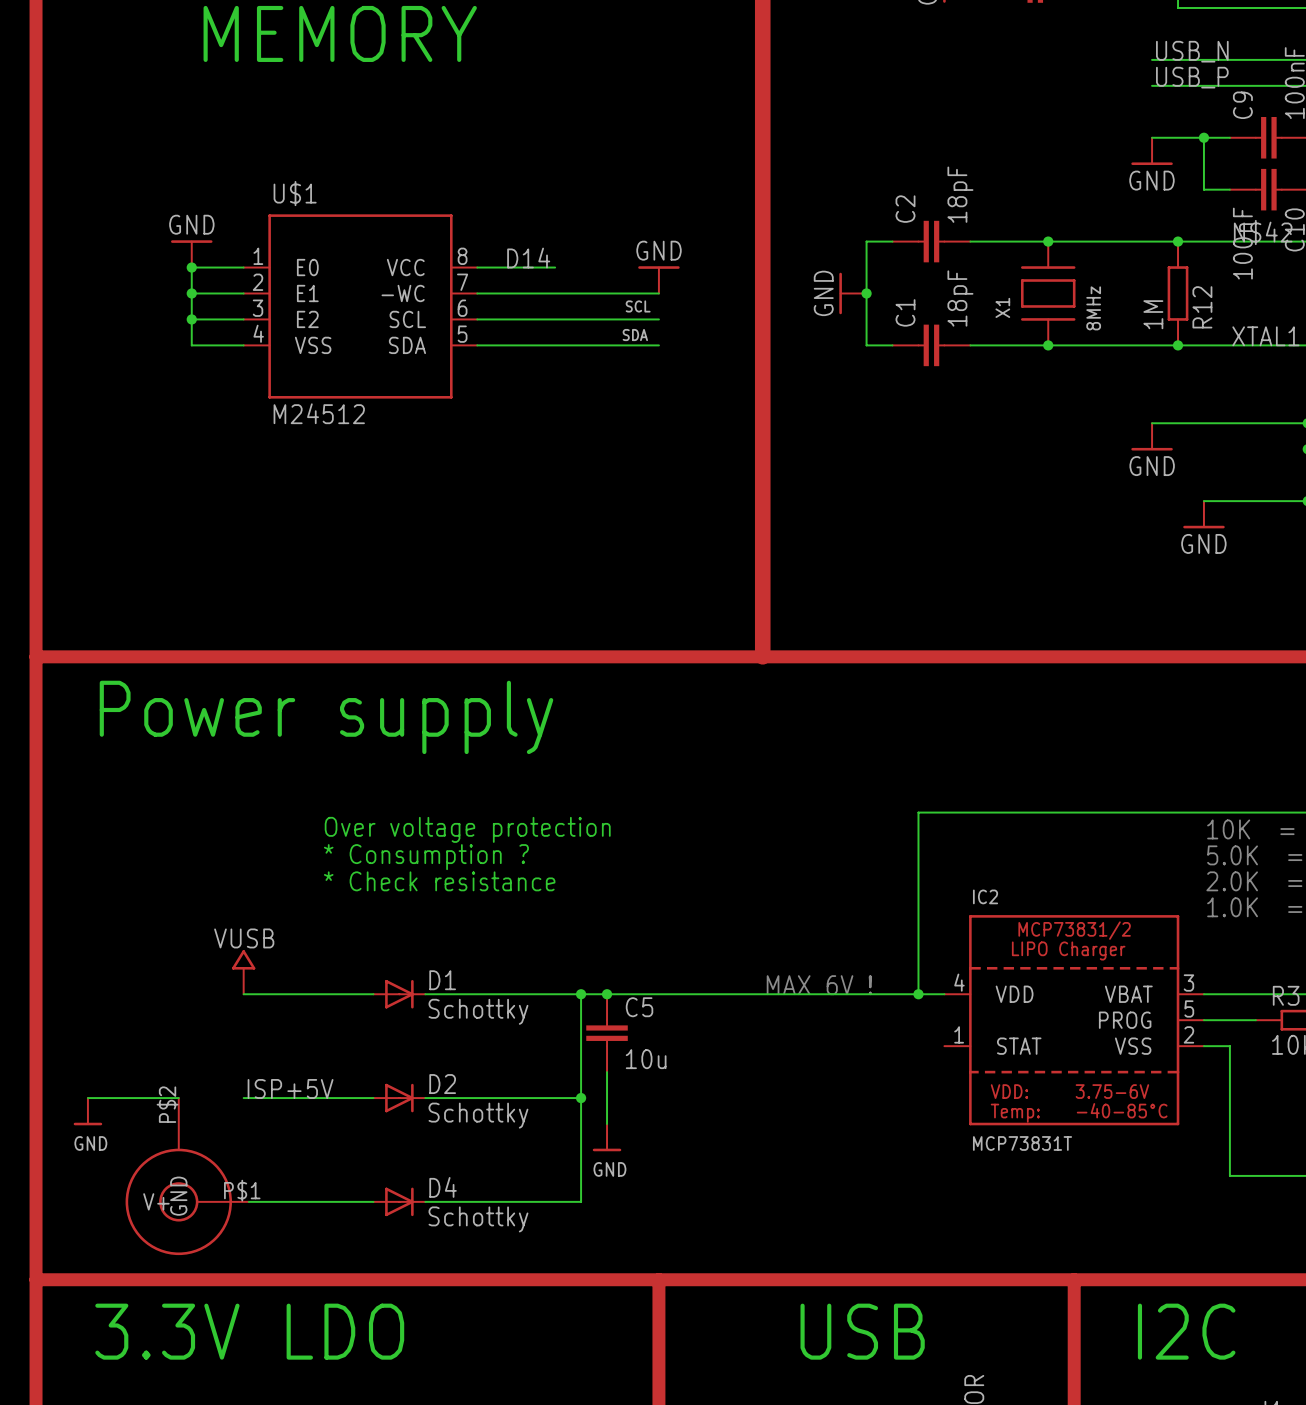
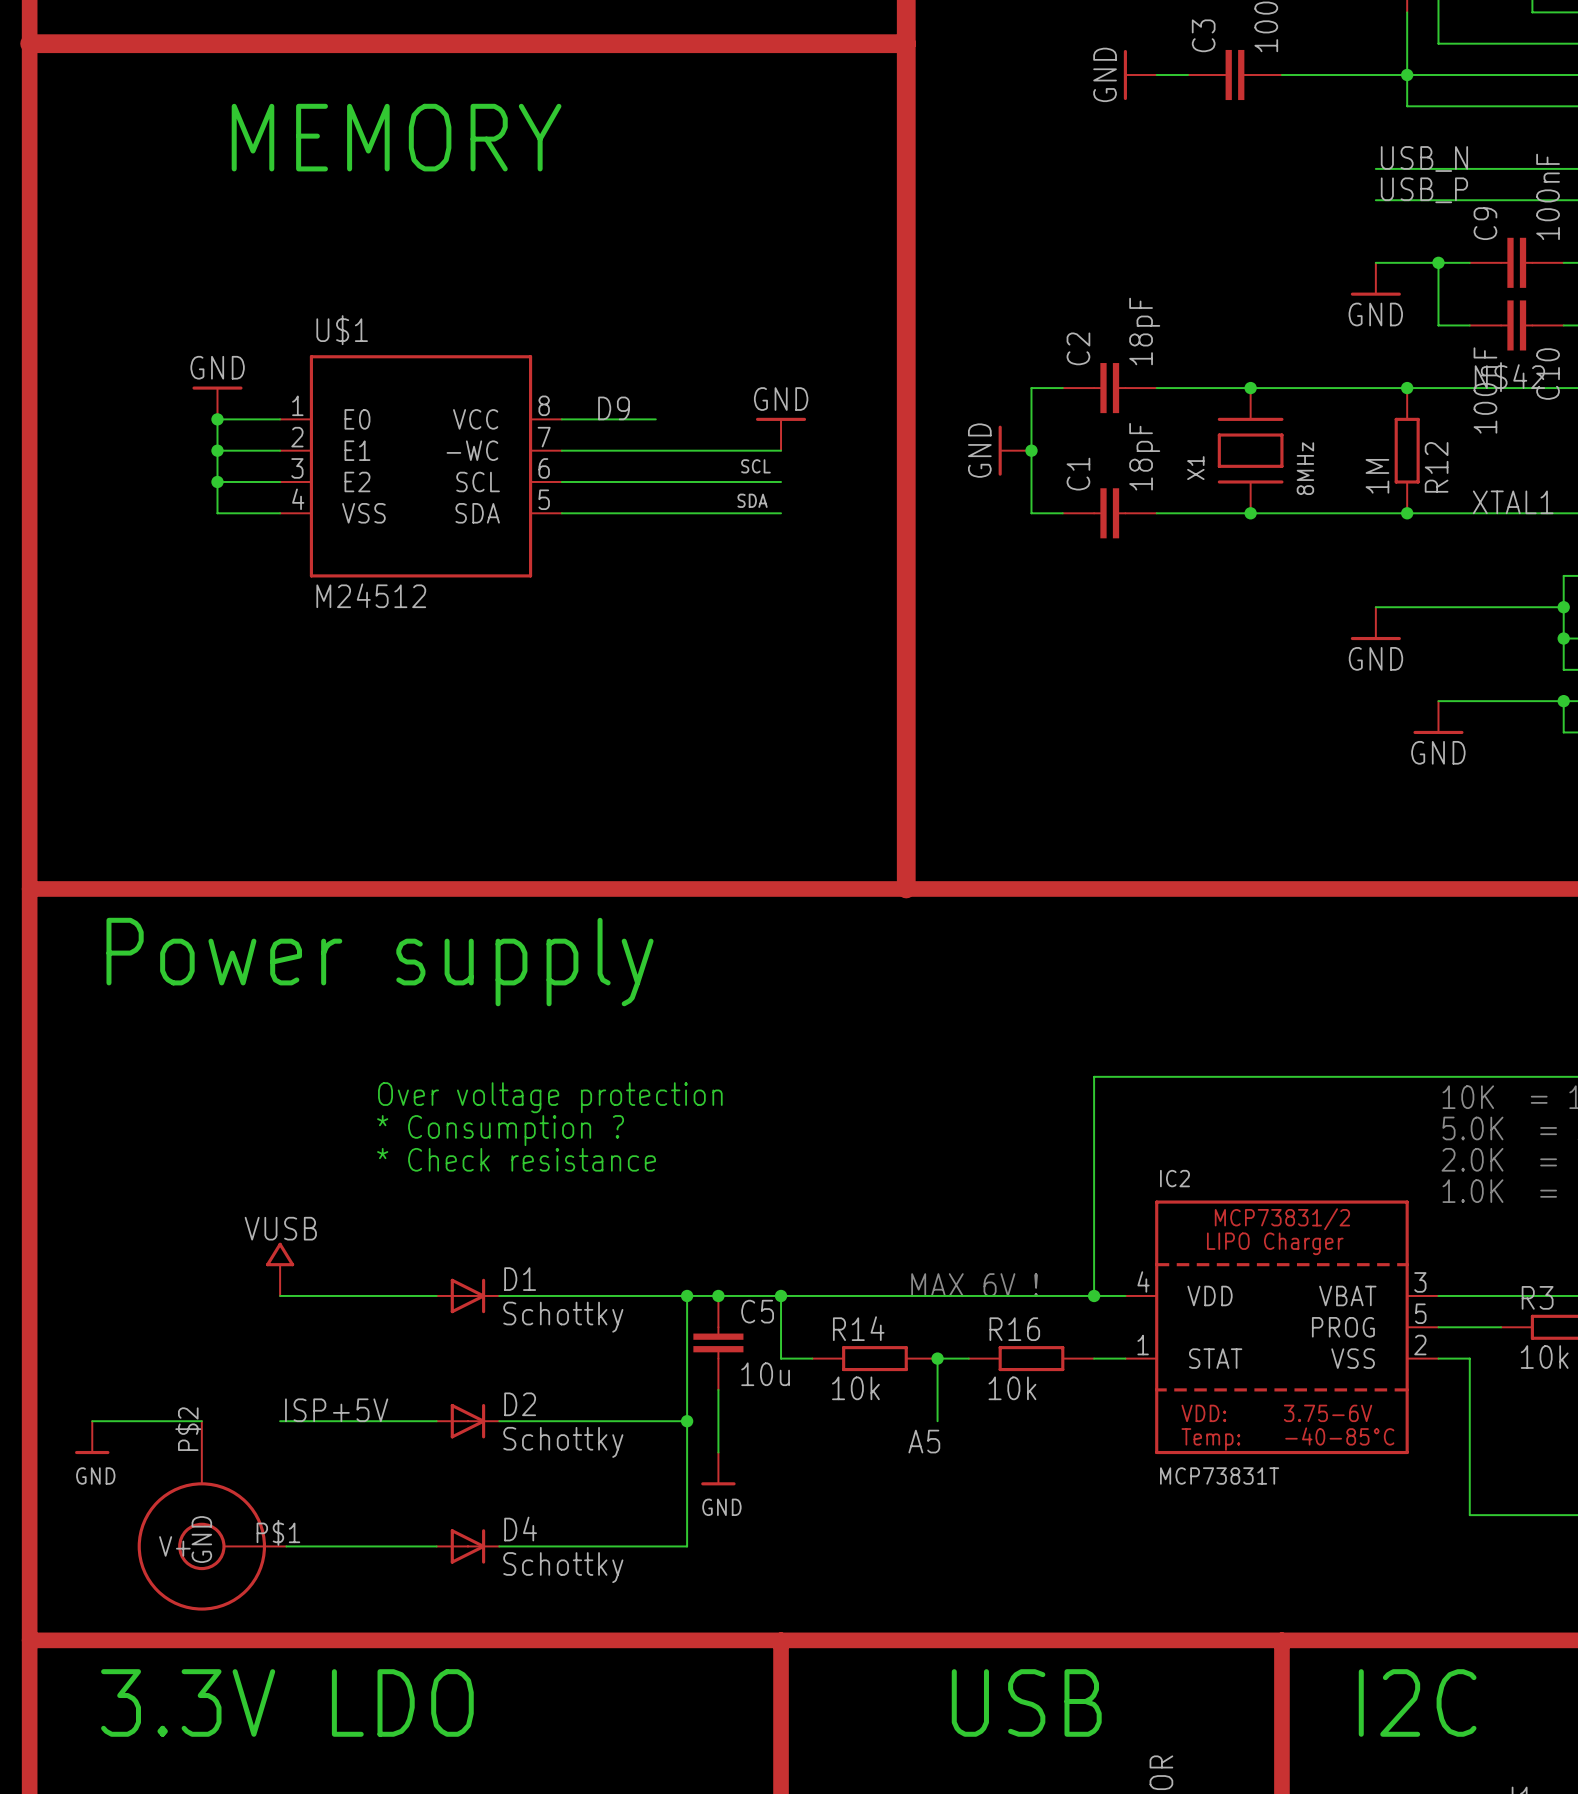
label: D14 (528, 258) -> D9 (614, 408)
wire: none -> (781, 1295) (781, 1358) (812, 1358)
junction: none -> (781, 1295)
R14: none -> 10k (874, 1358)
junction: none -> (937, 1358)
wire: none -> (968, 1358) (937, 1358) (937, 1421)
R16: none -> 10k (1031, 1358)
wire: none -> (1094, 1358) (1125, 1358)
label: none -> A5 (924, 1441)

